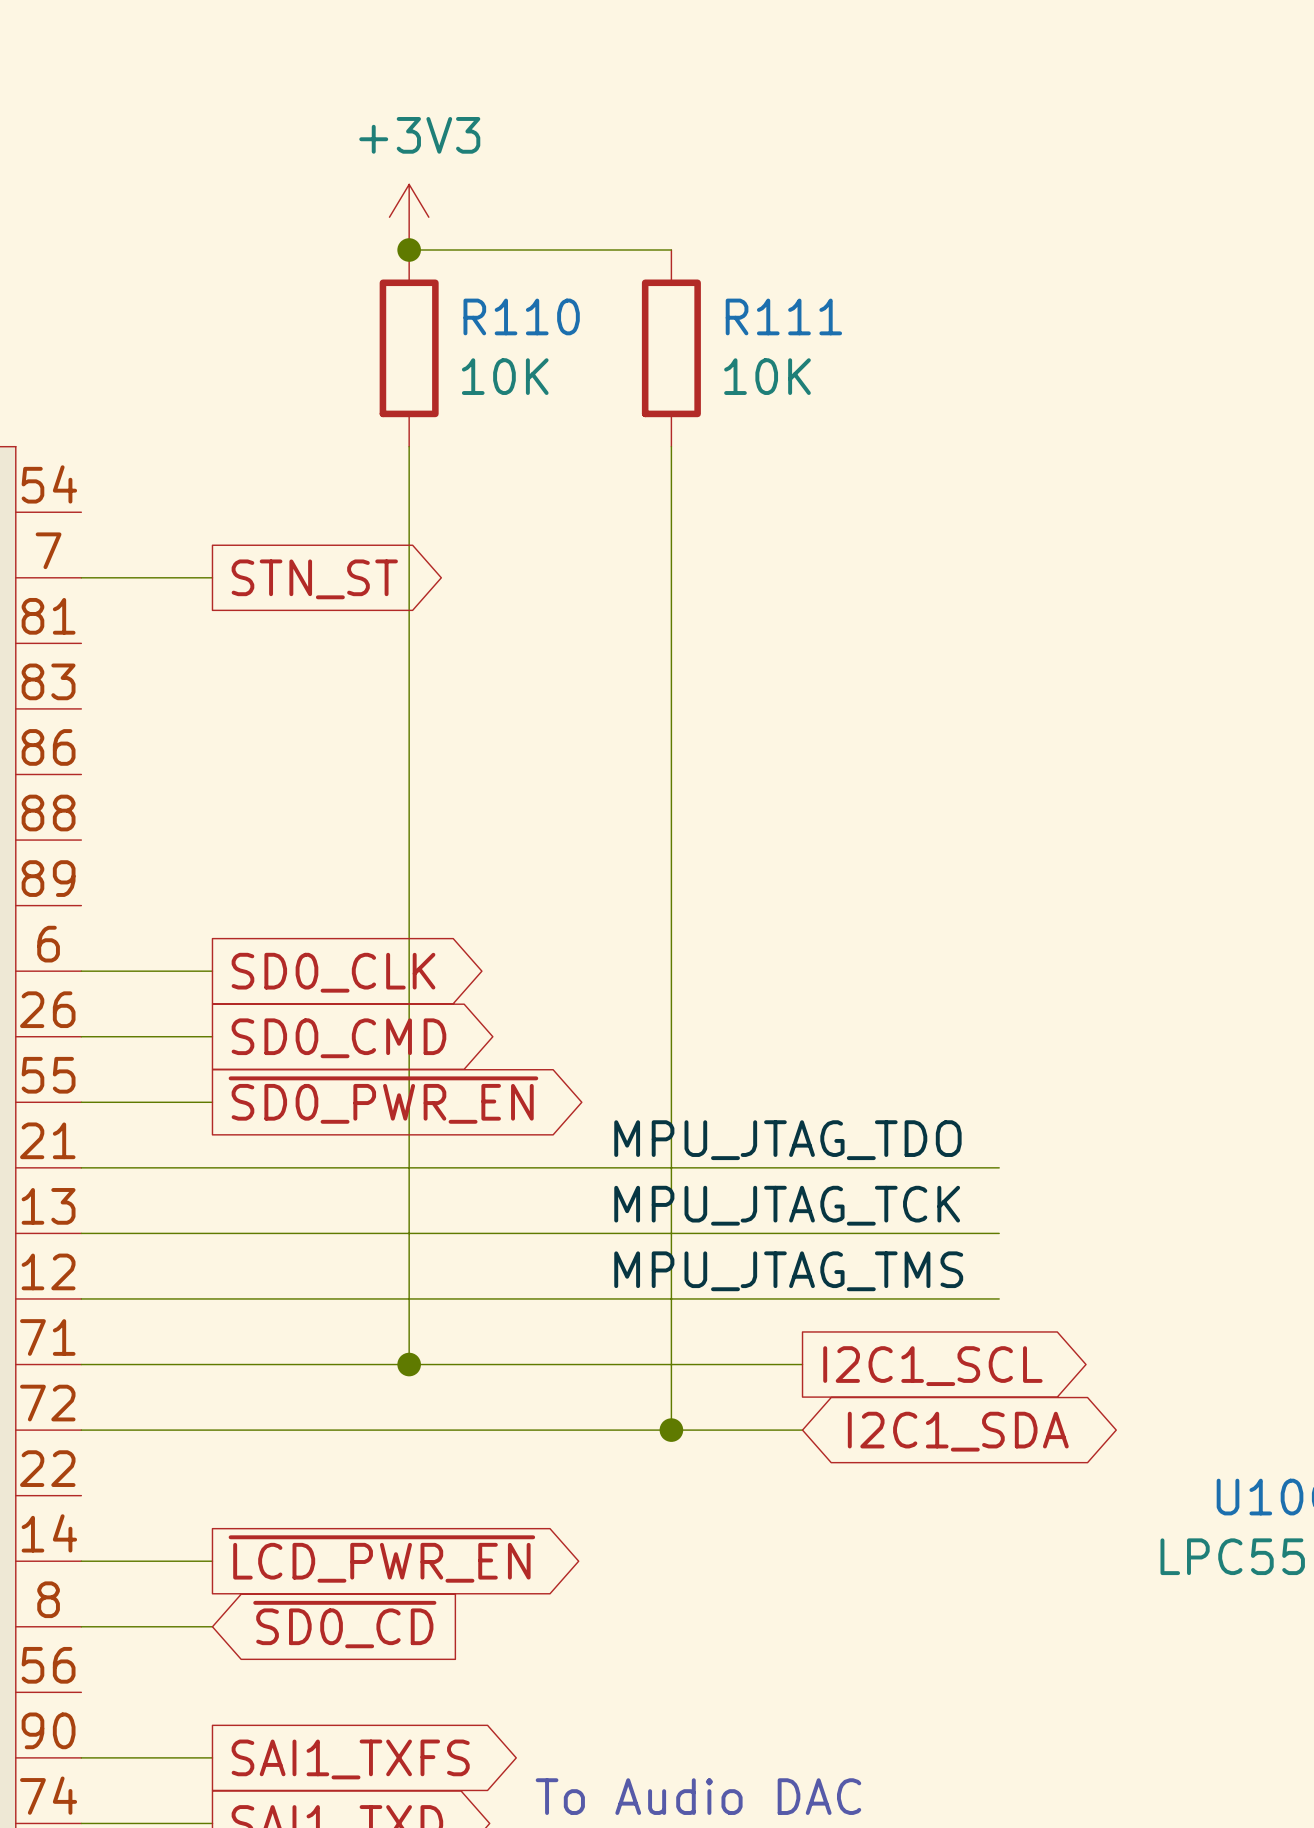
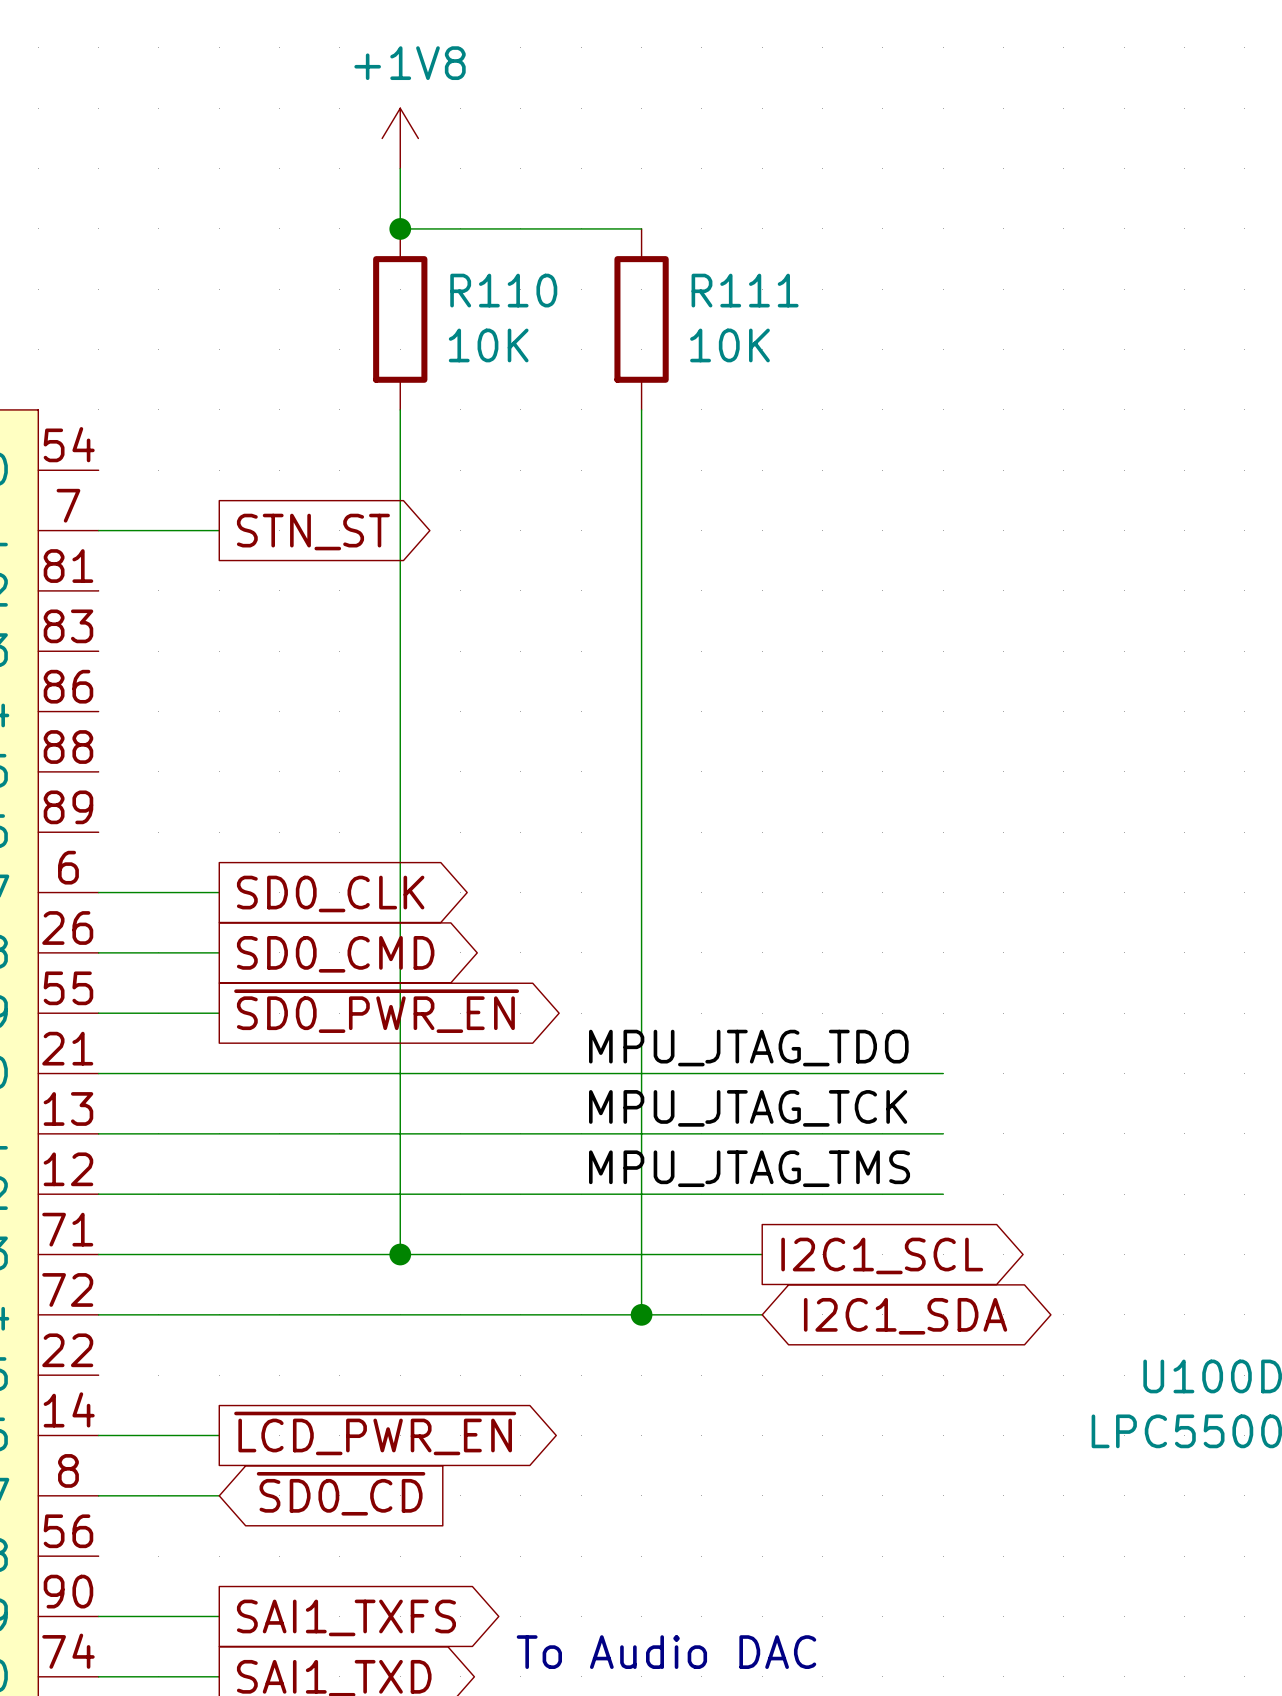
power symbol: none -> +1V8 (400, 138)
power symbol: +3V3 (409, 217) -> none

